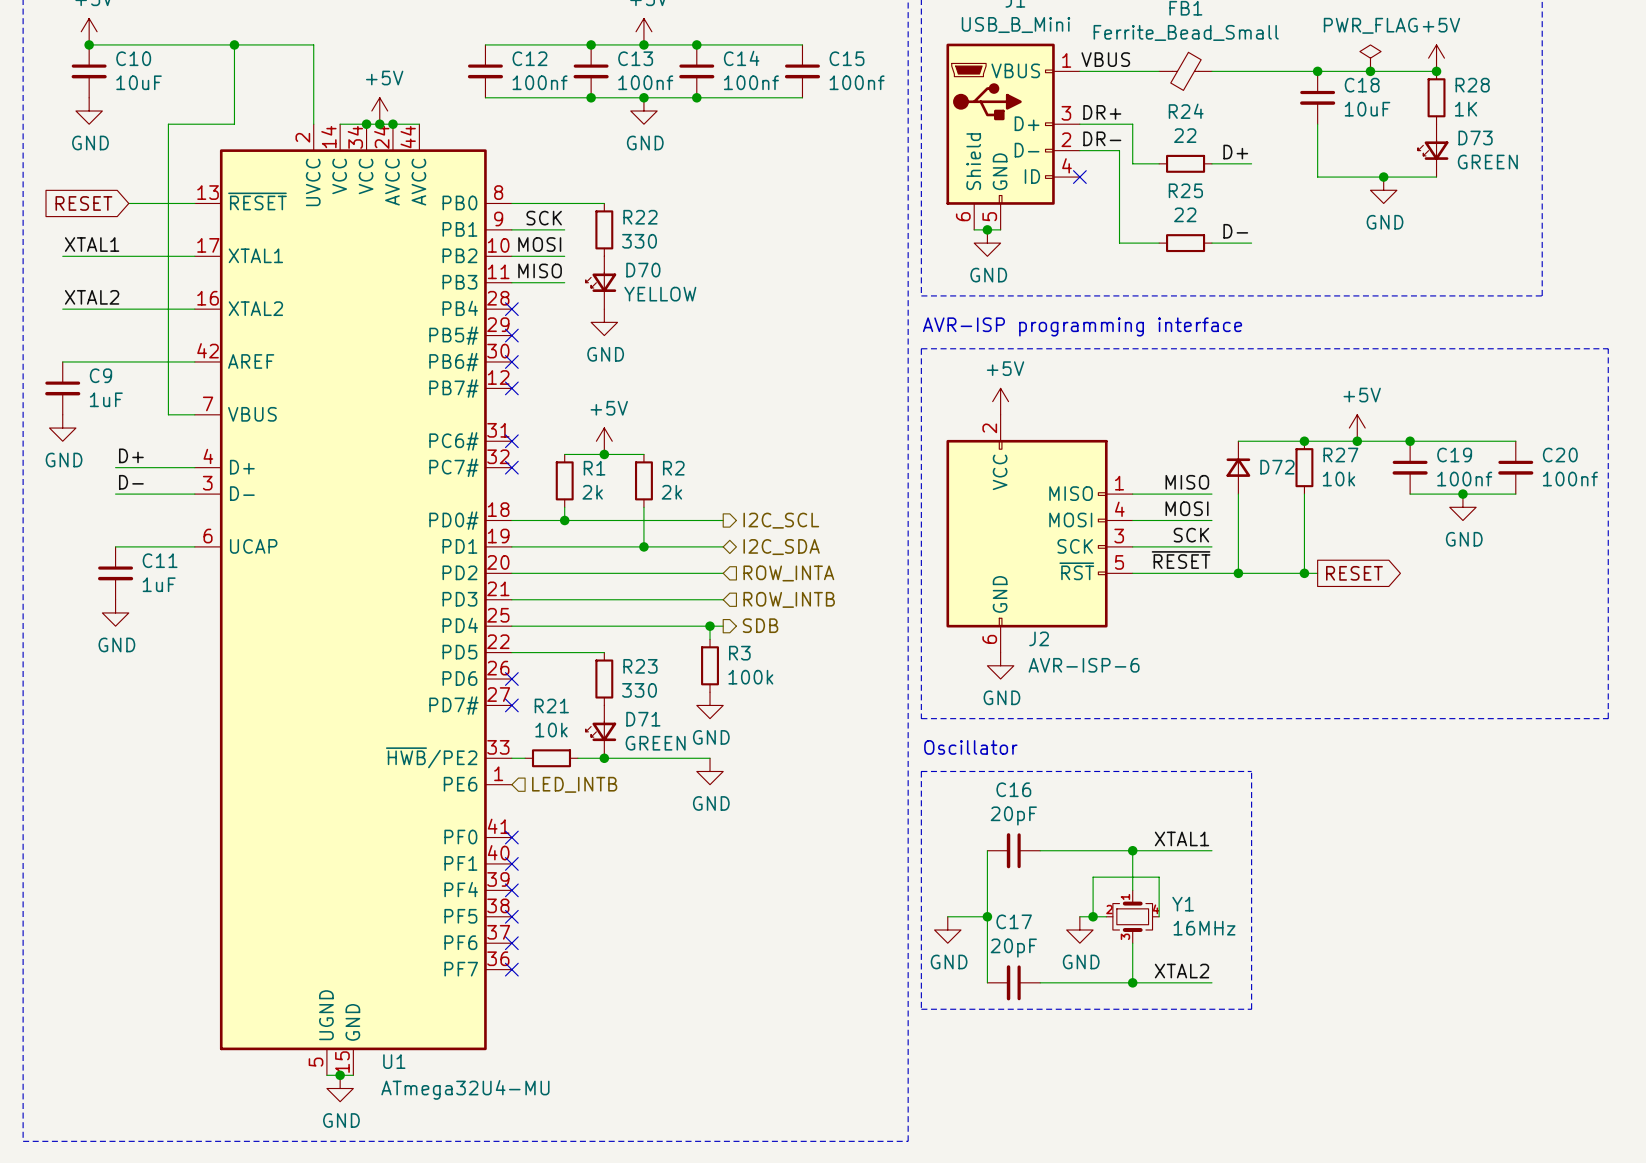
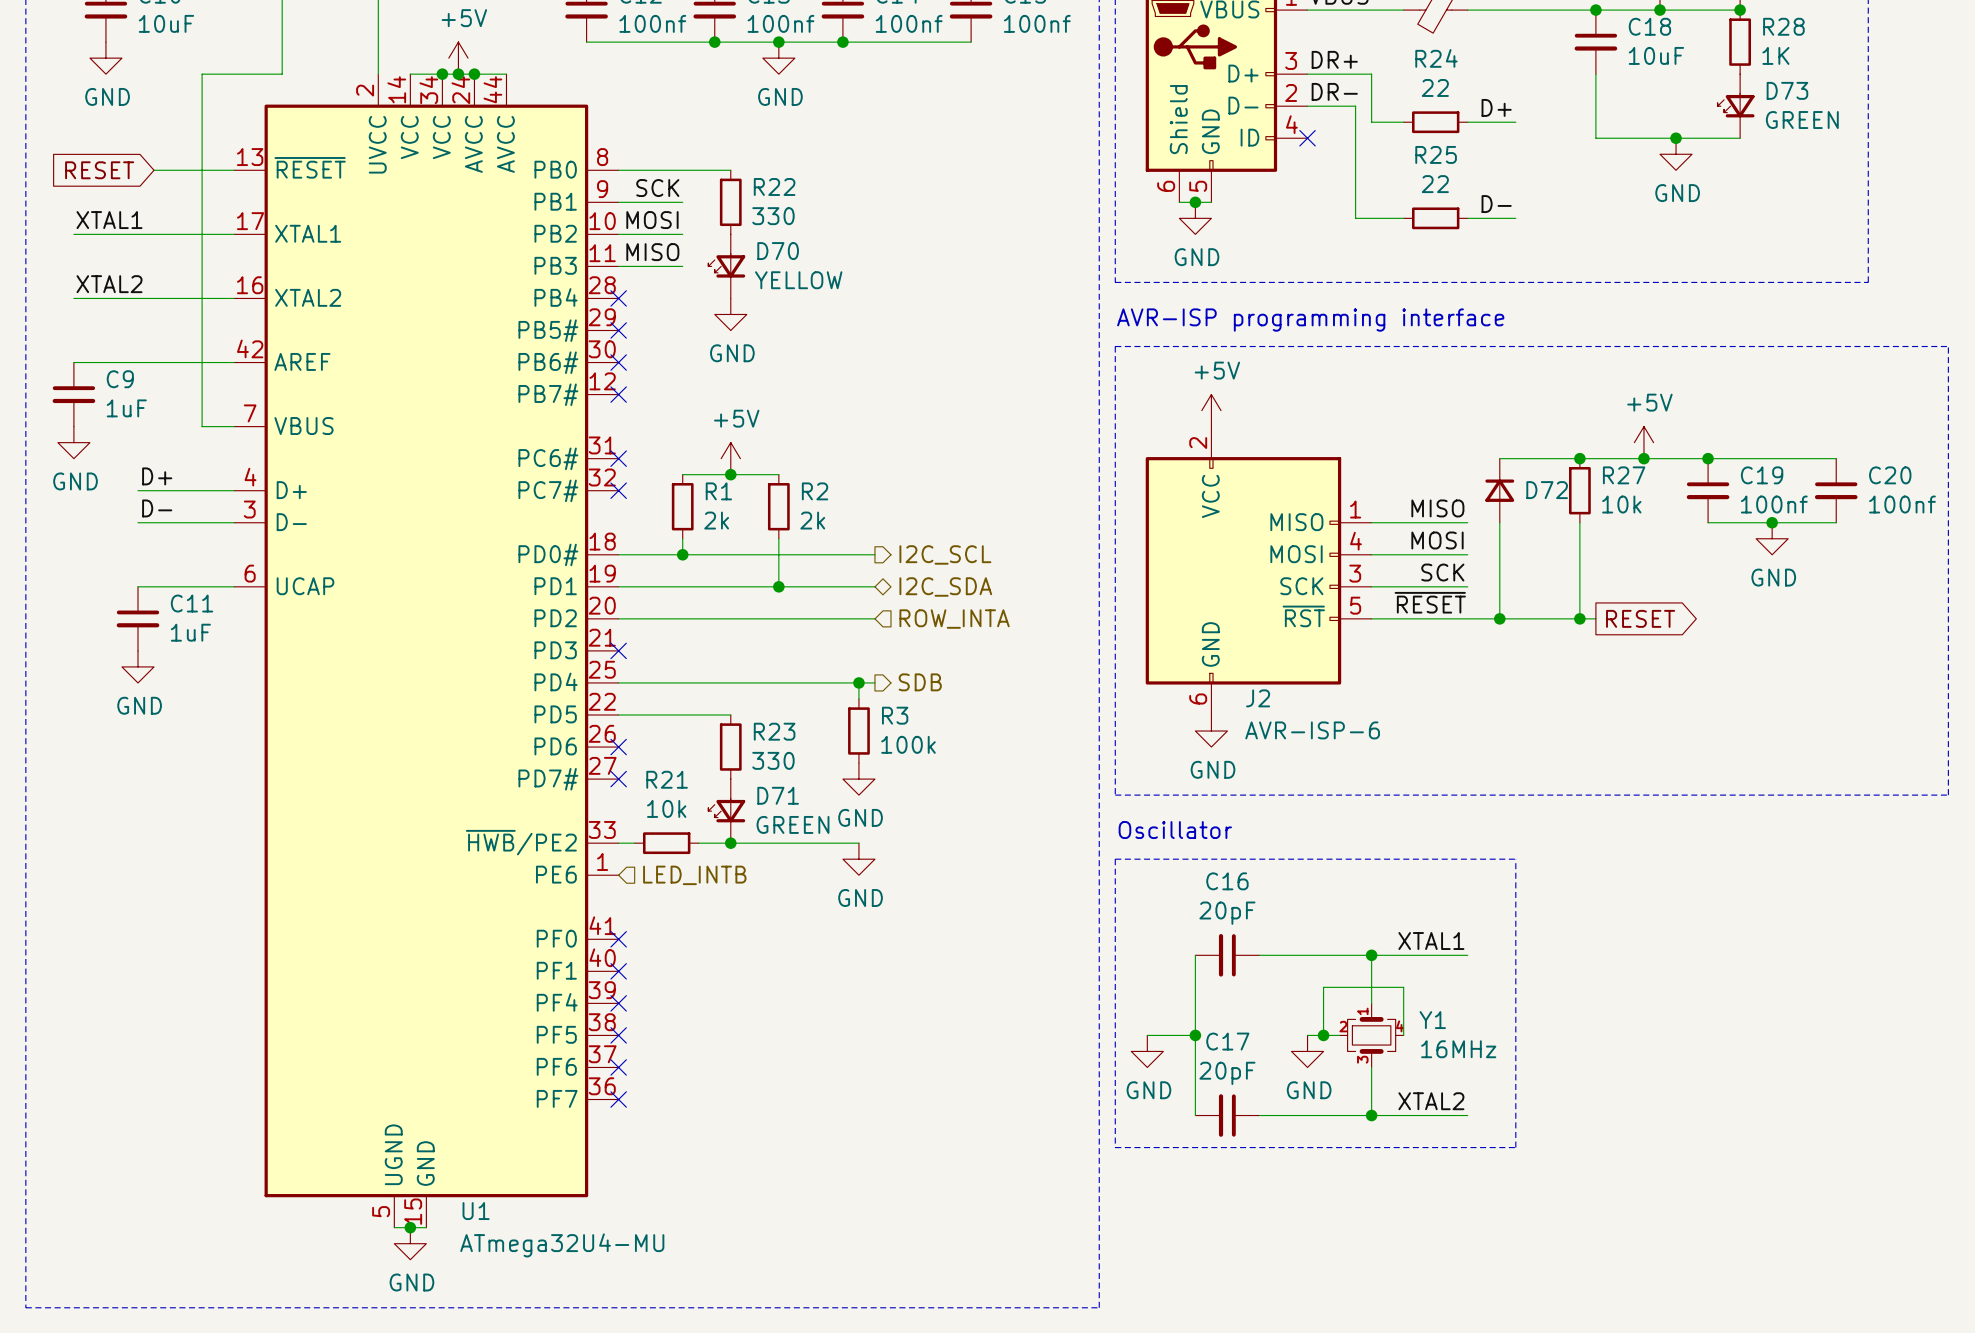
wire: (511, 599) (723, 599) -> none
no-connect mark: none -> (618, 650)
hierarchical label: ROW_INTB (789, 599) -> none

